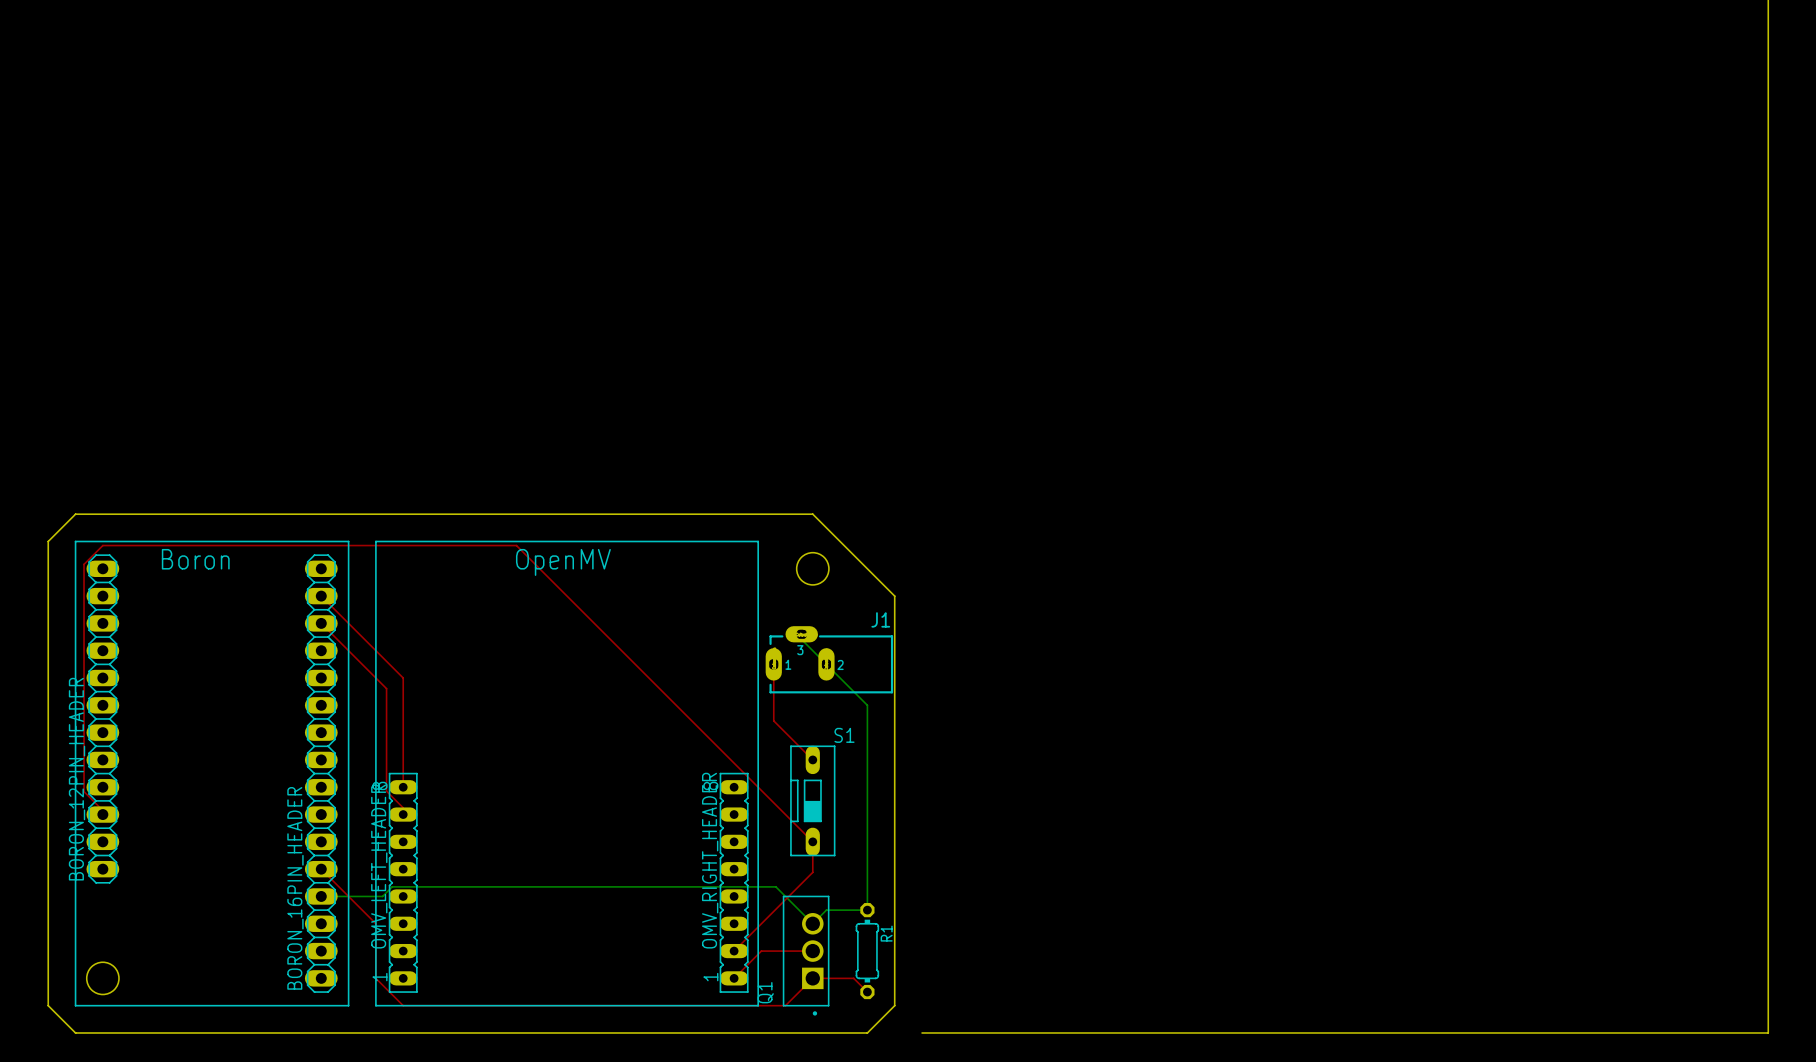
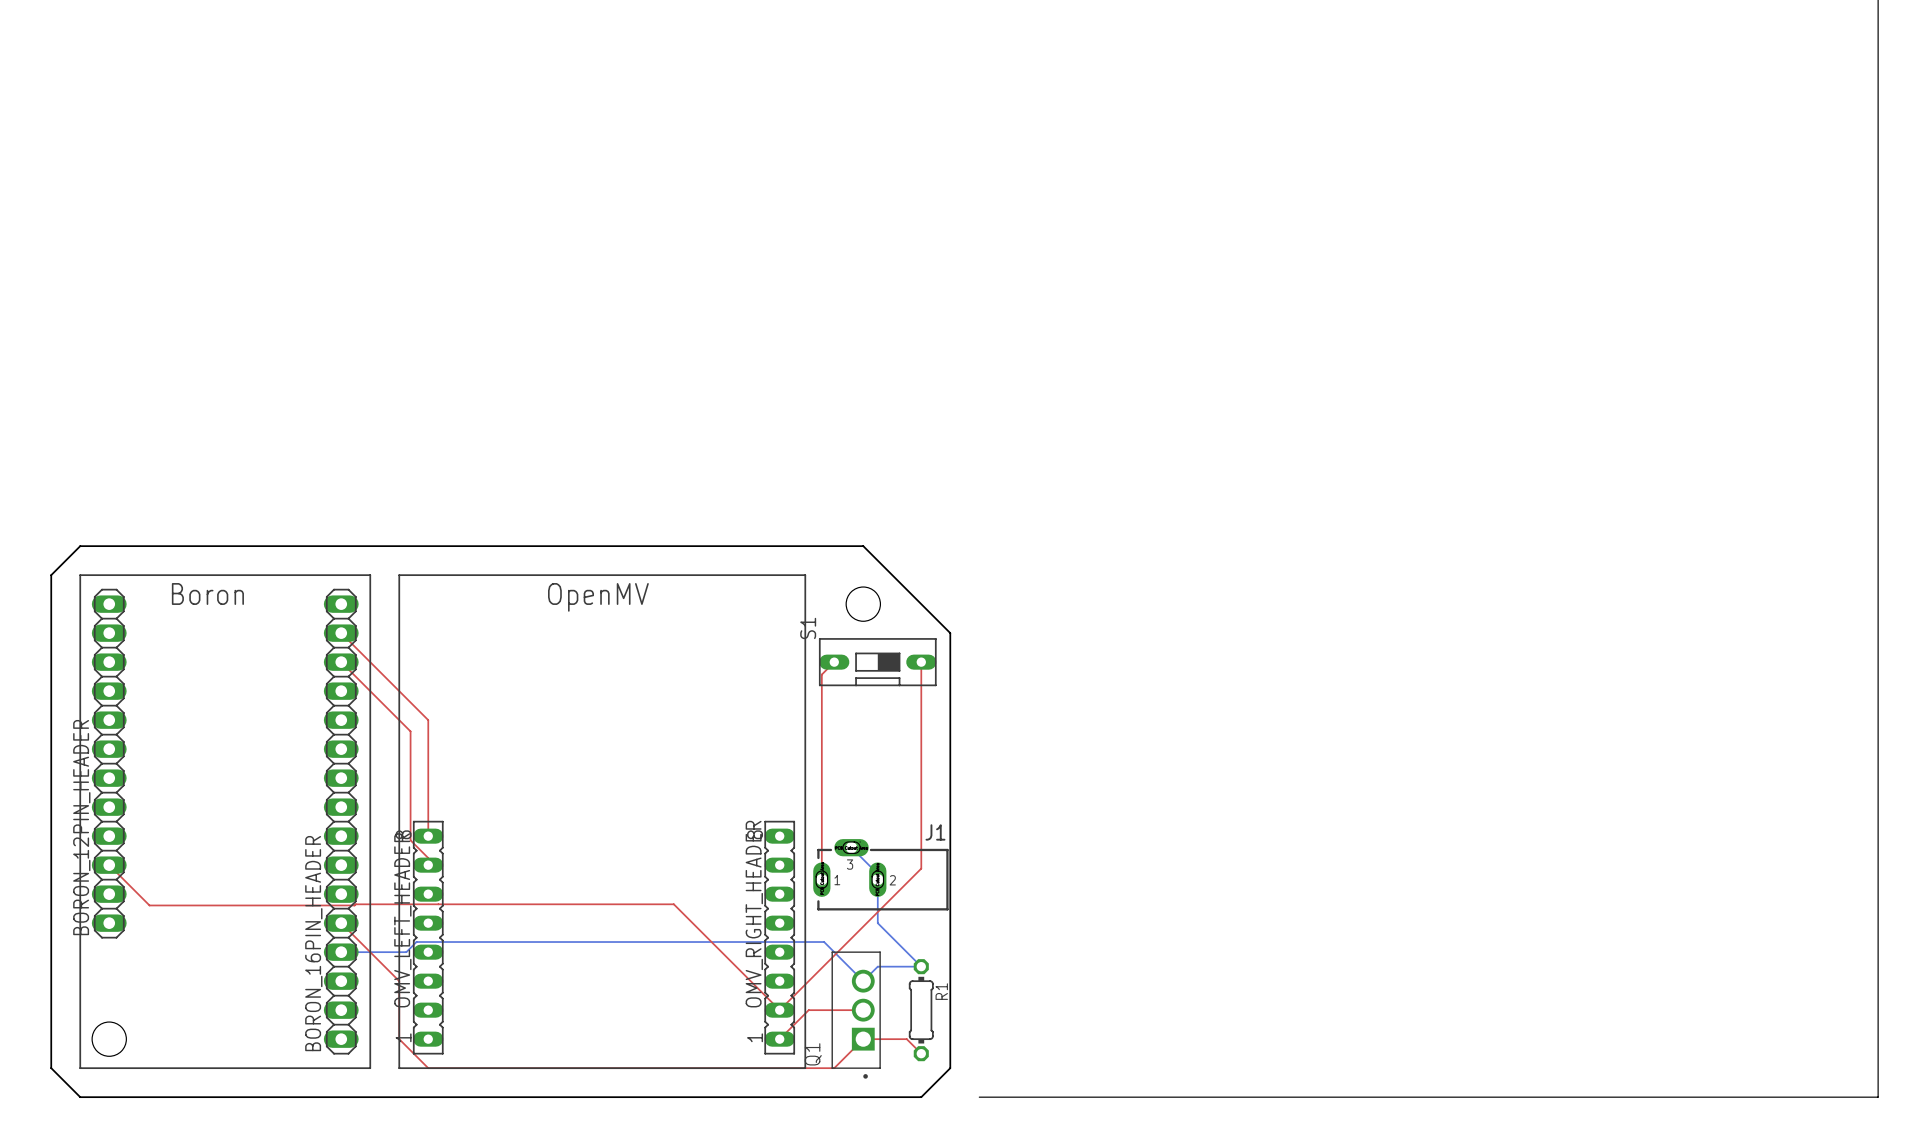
top track: none -> (834, 662) (821, 674) (821, 705)
bottom track: (801, 634) (801, 639) (867, 705) (867, 910) -> (851, 847) (877, 873) (877, 923) (921, 966)
J1 position: (829, 659) -> (880, 874)
top track: (773, 720) (812, 759) -> (821, 765) (821, 879)
S1 rotation: 0° (812, 800) -> 90° counterclockwise (877, 662)
S1 position: (812, 800) -> (877, 662)
top track: (102, 810) (84, 791) (84, 564) (102, 545) (516, 545) (812, 841) (812, 872) -> (921, 662) (921, 868) (863, 926)
top track: none -> (109, 865) (149, 905) (673, 904) (779, 1010)

